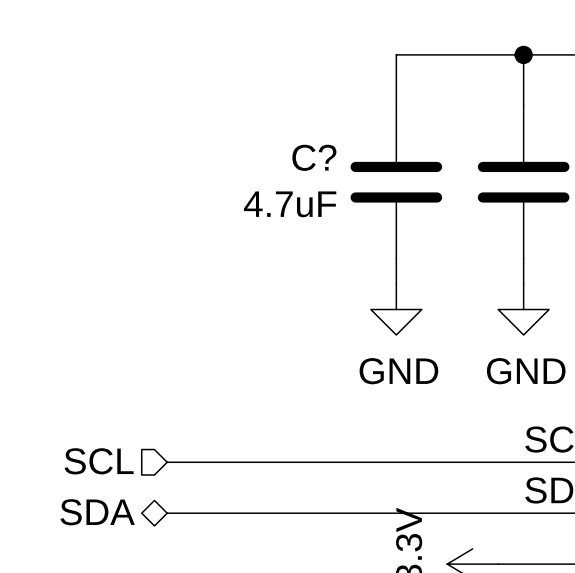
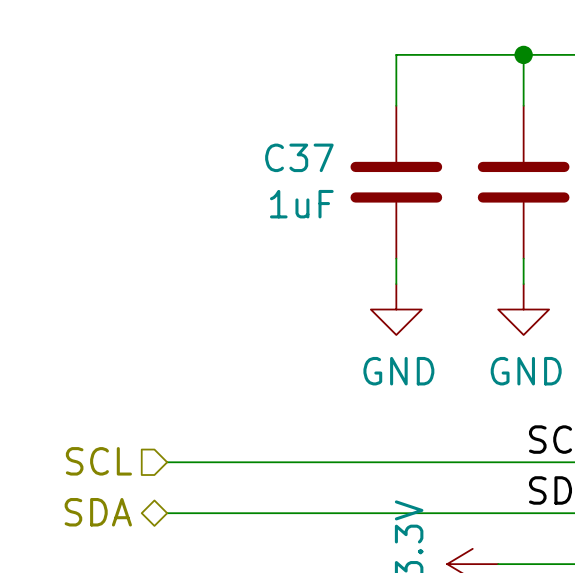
C? name: C? (314, 157) -> C37 (299, 157)
C? value: 4.7uF (290, 204) -> 1uF (301, 204)

